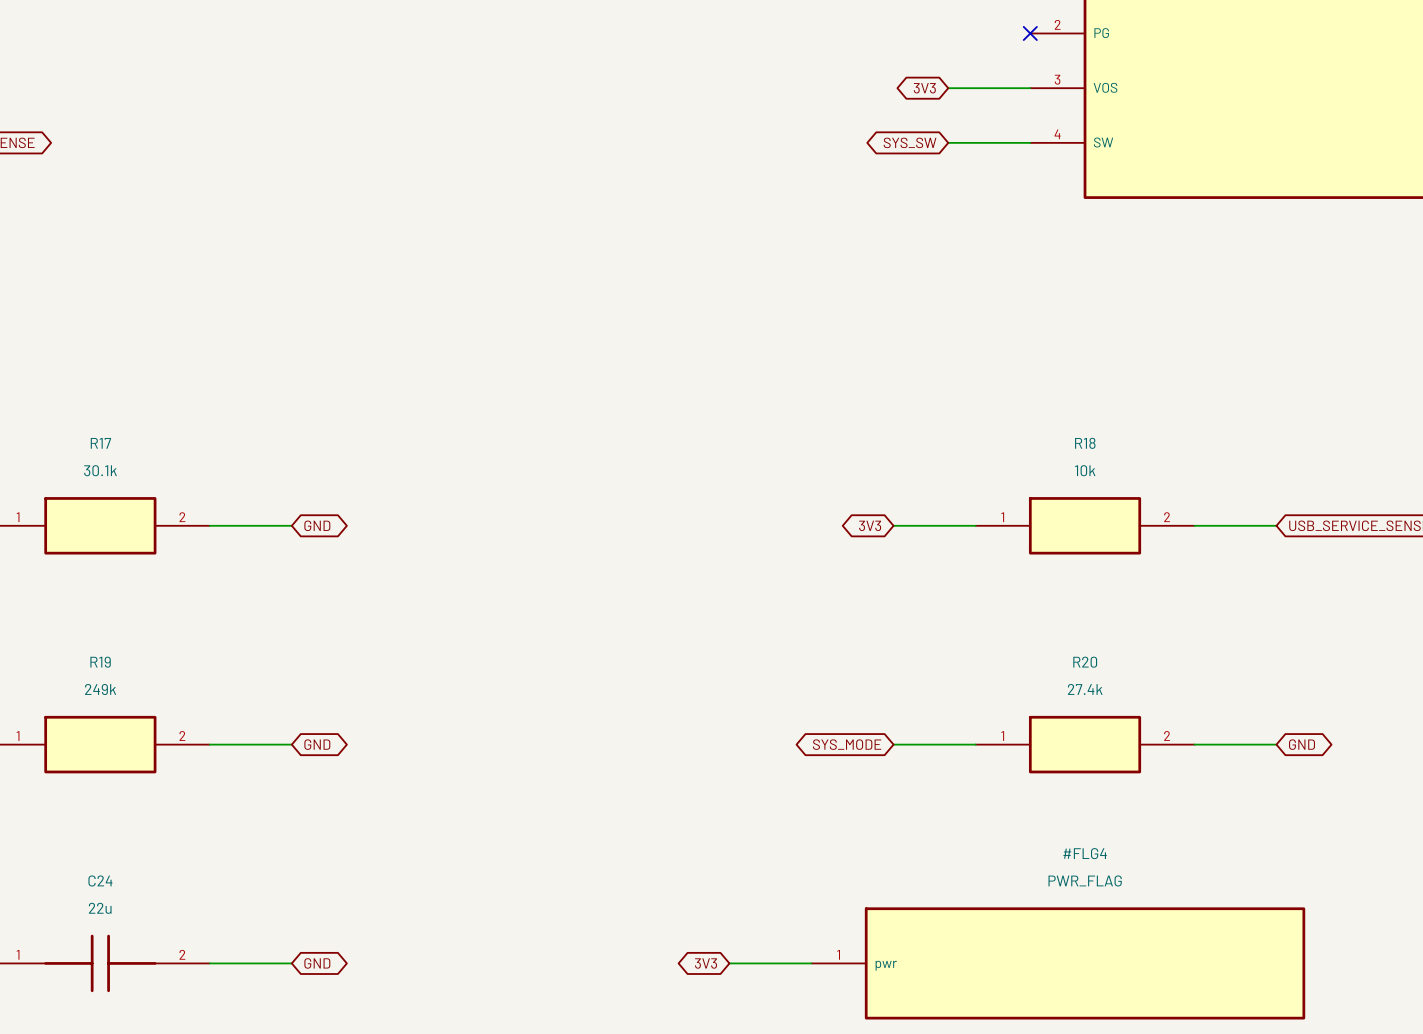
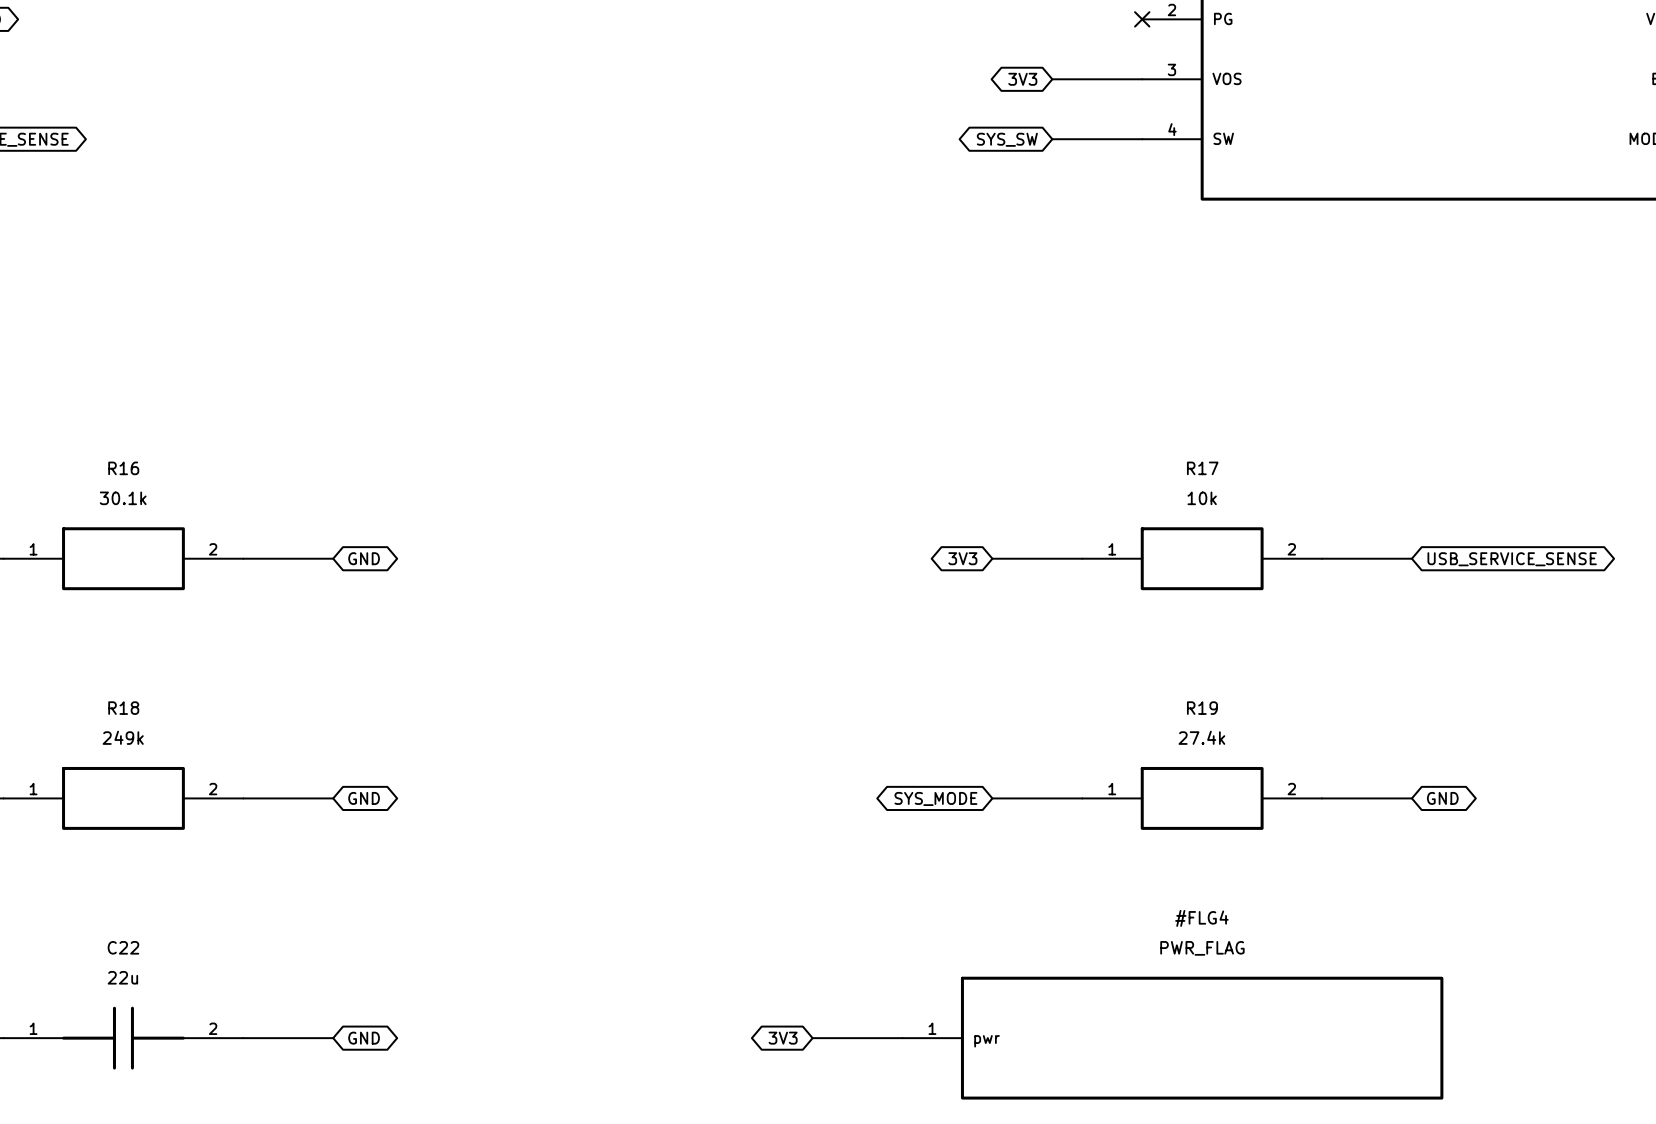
R17 name: R17 (100, 443) -> R16 (123, 468)
R18 name: R18 (1085, 443) -> R17 (1202, 468)
R19 name: R19 (100, 662) -> R18 (123, 708)
R20 name: R20 (1085, 662) -> R19 (1202, 708)
C24 name: C24 (100, 880) -> C22 (123, 947)

